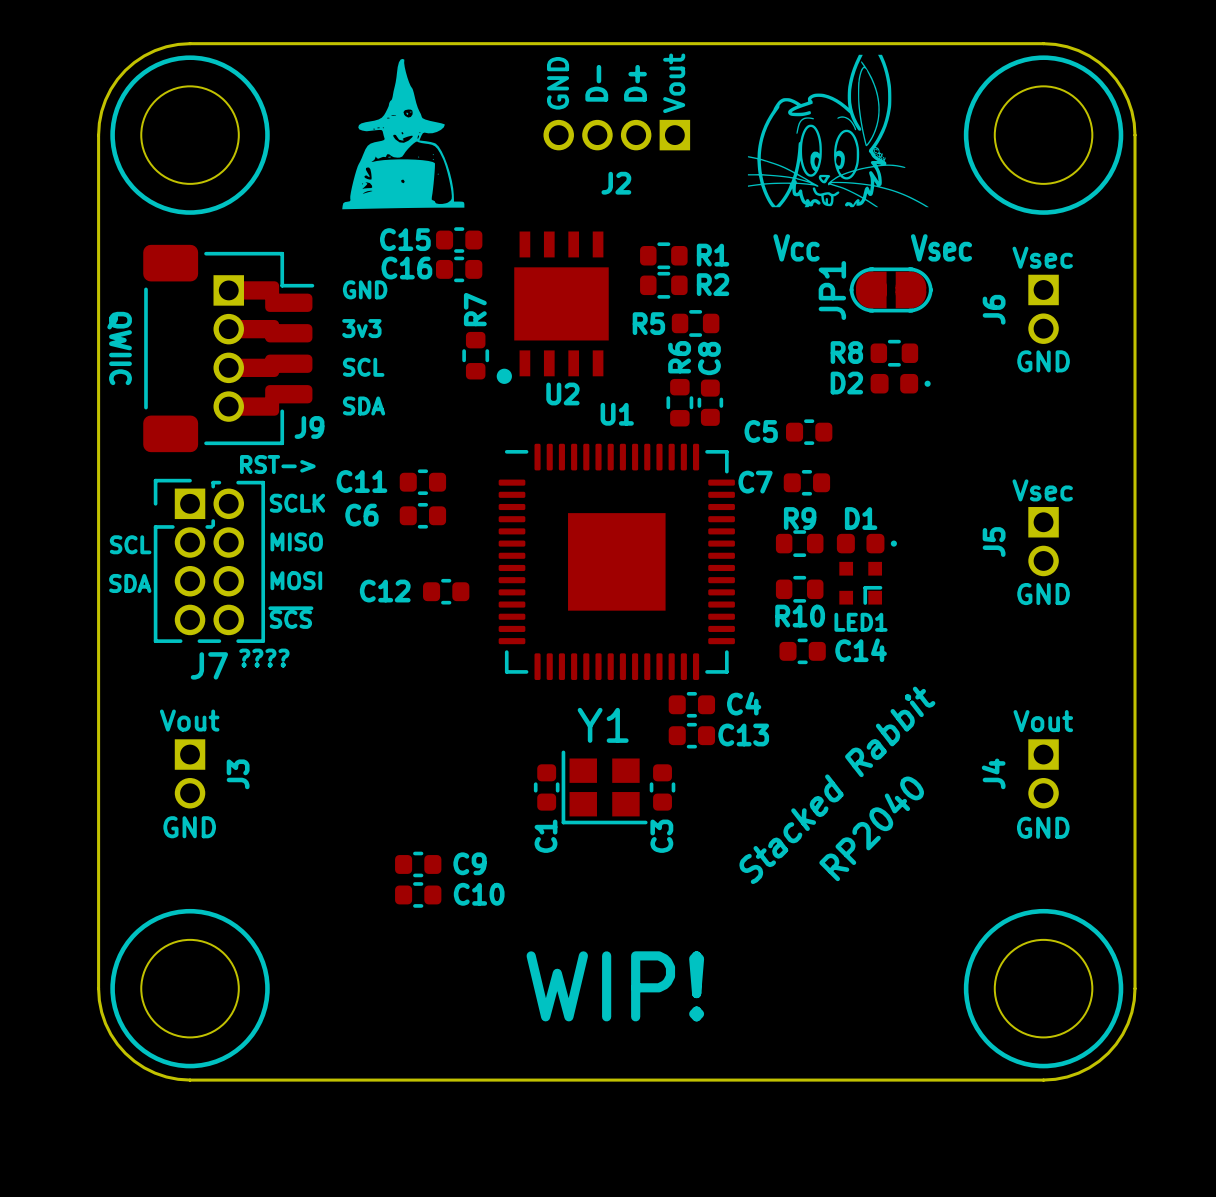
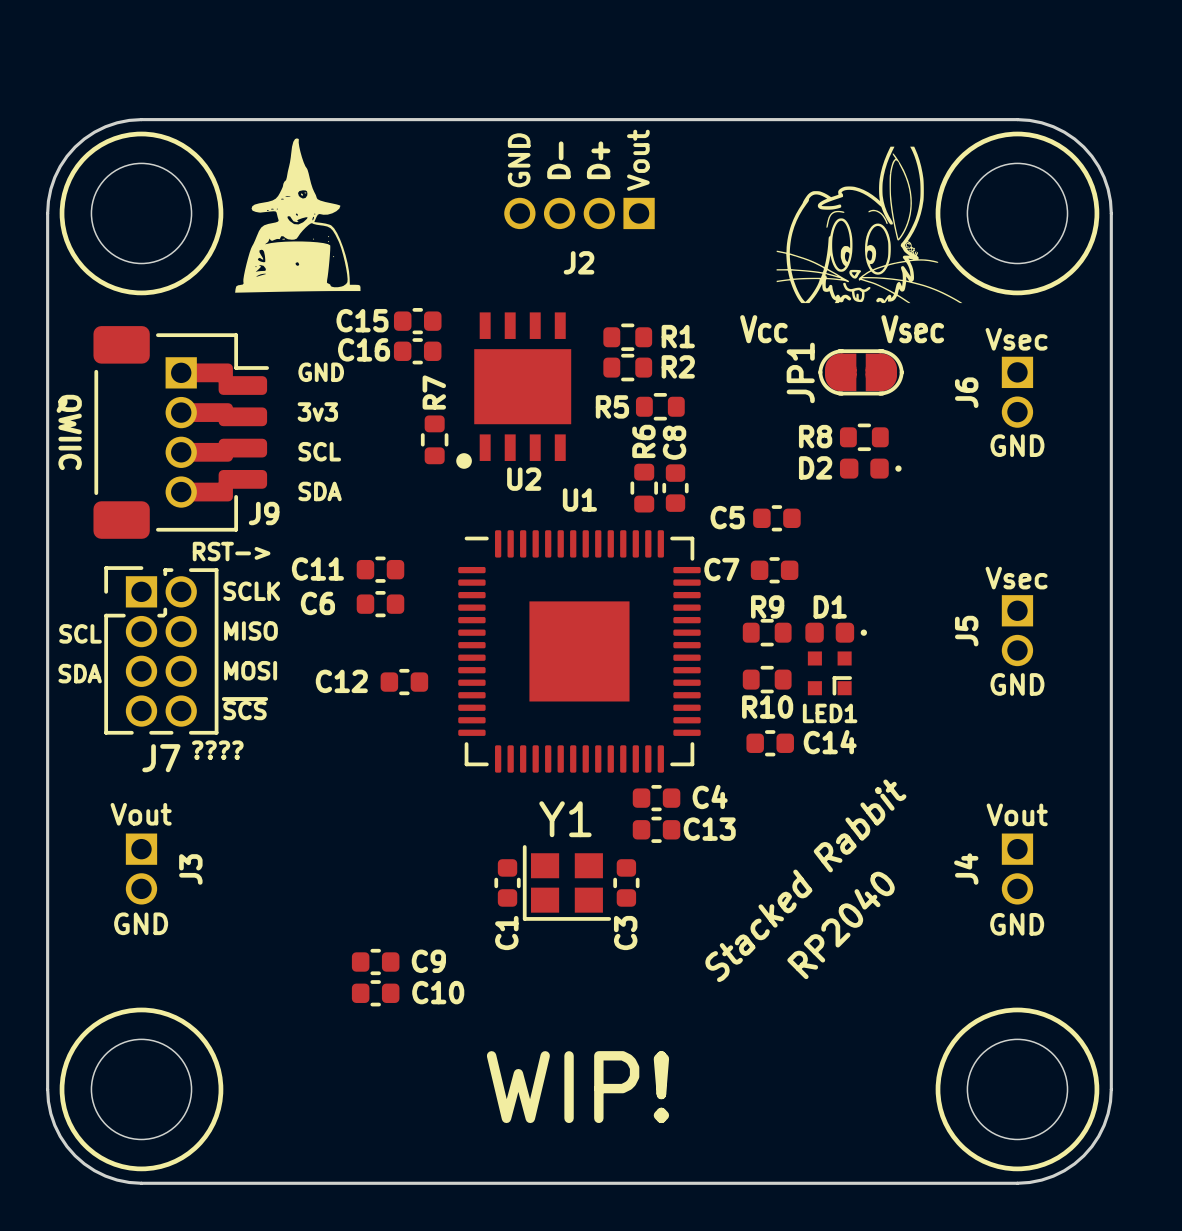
drawing position: (838, 131) -> (869, 224)
drawing position: (403, 134) -> (297, 215)

